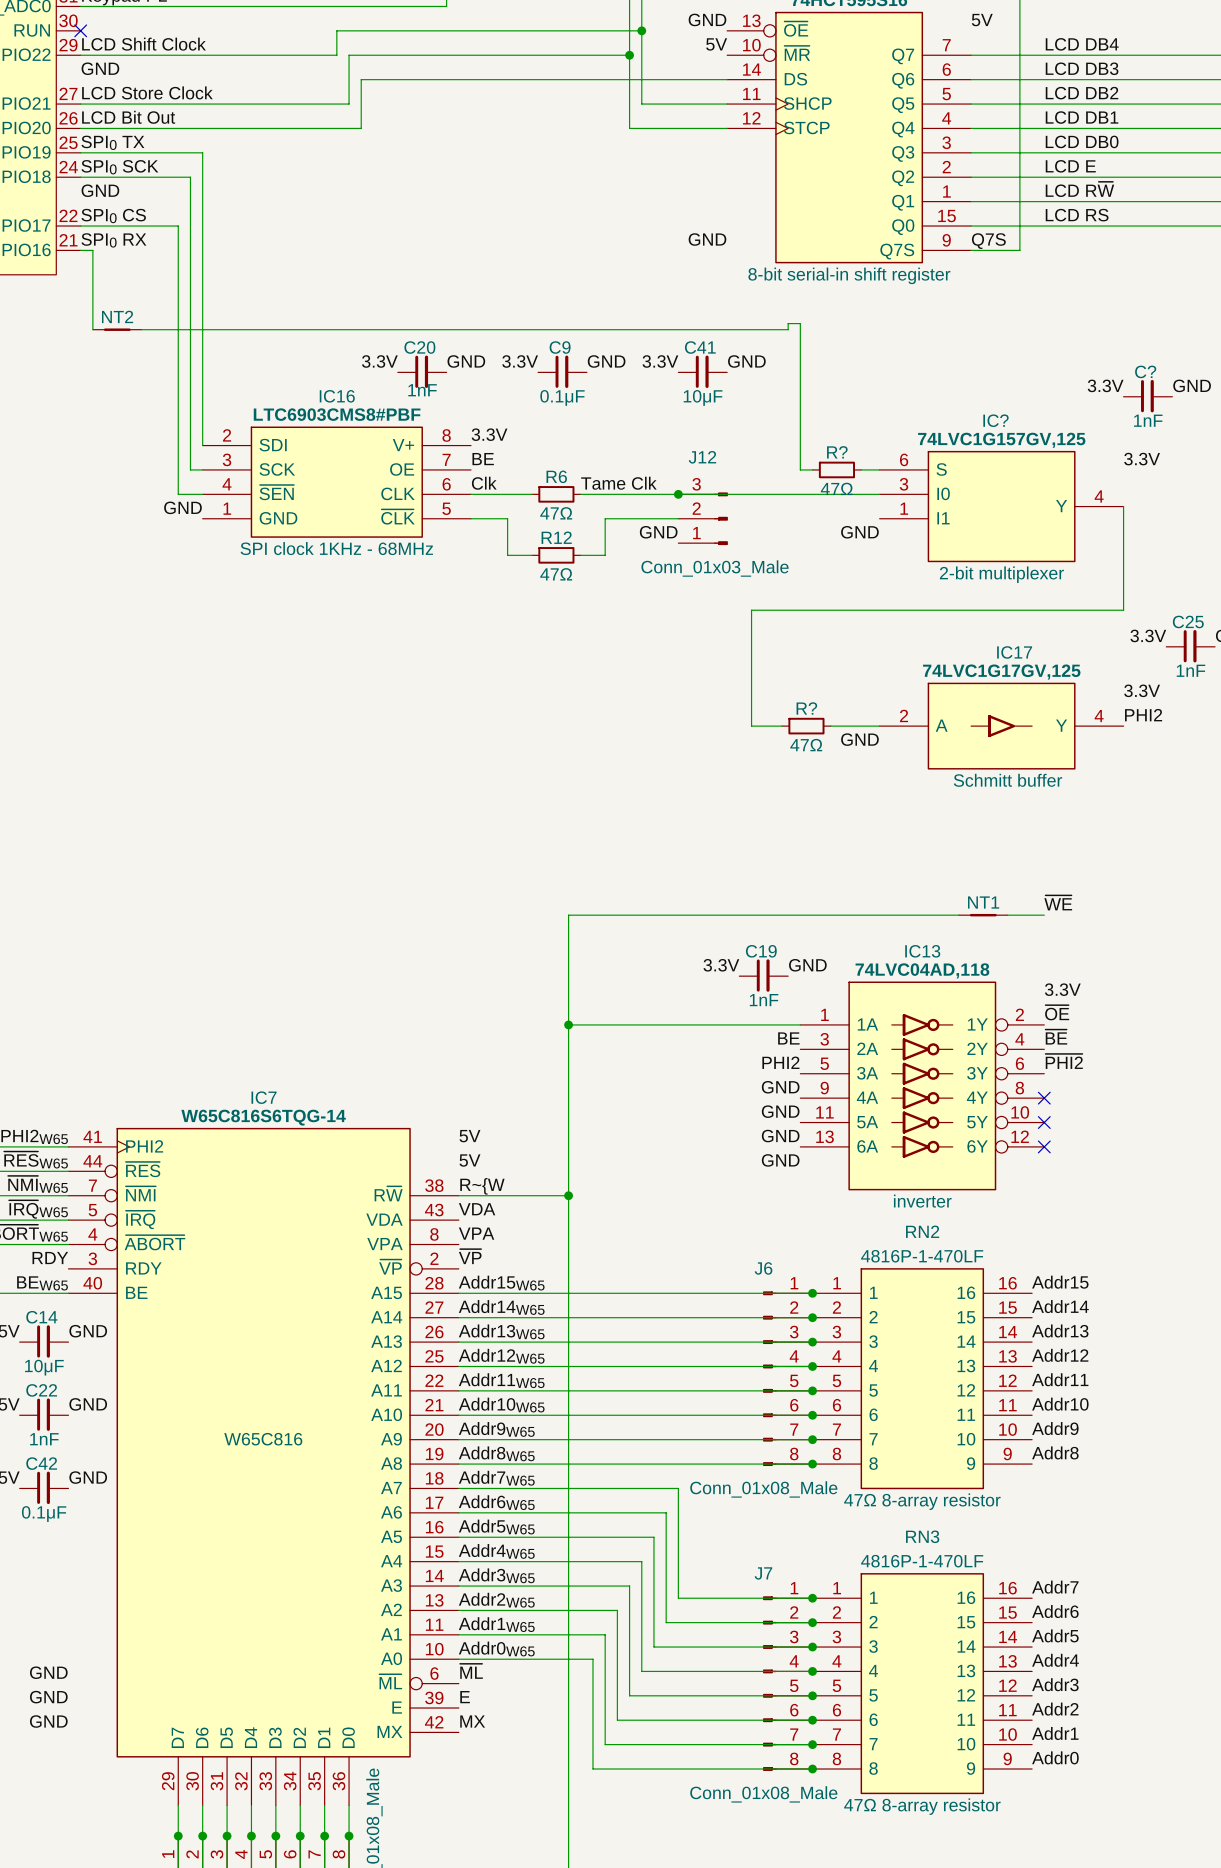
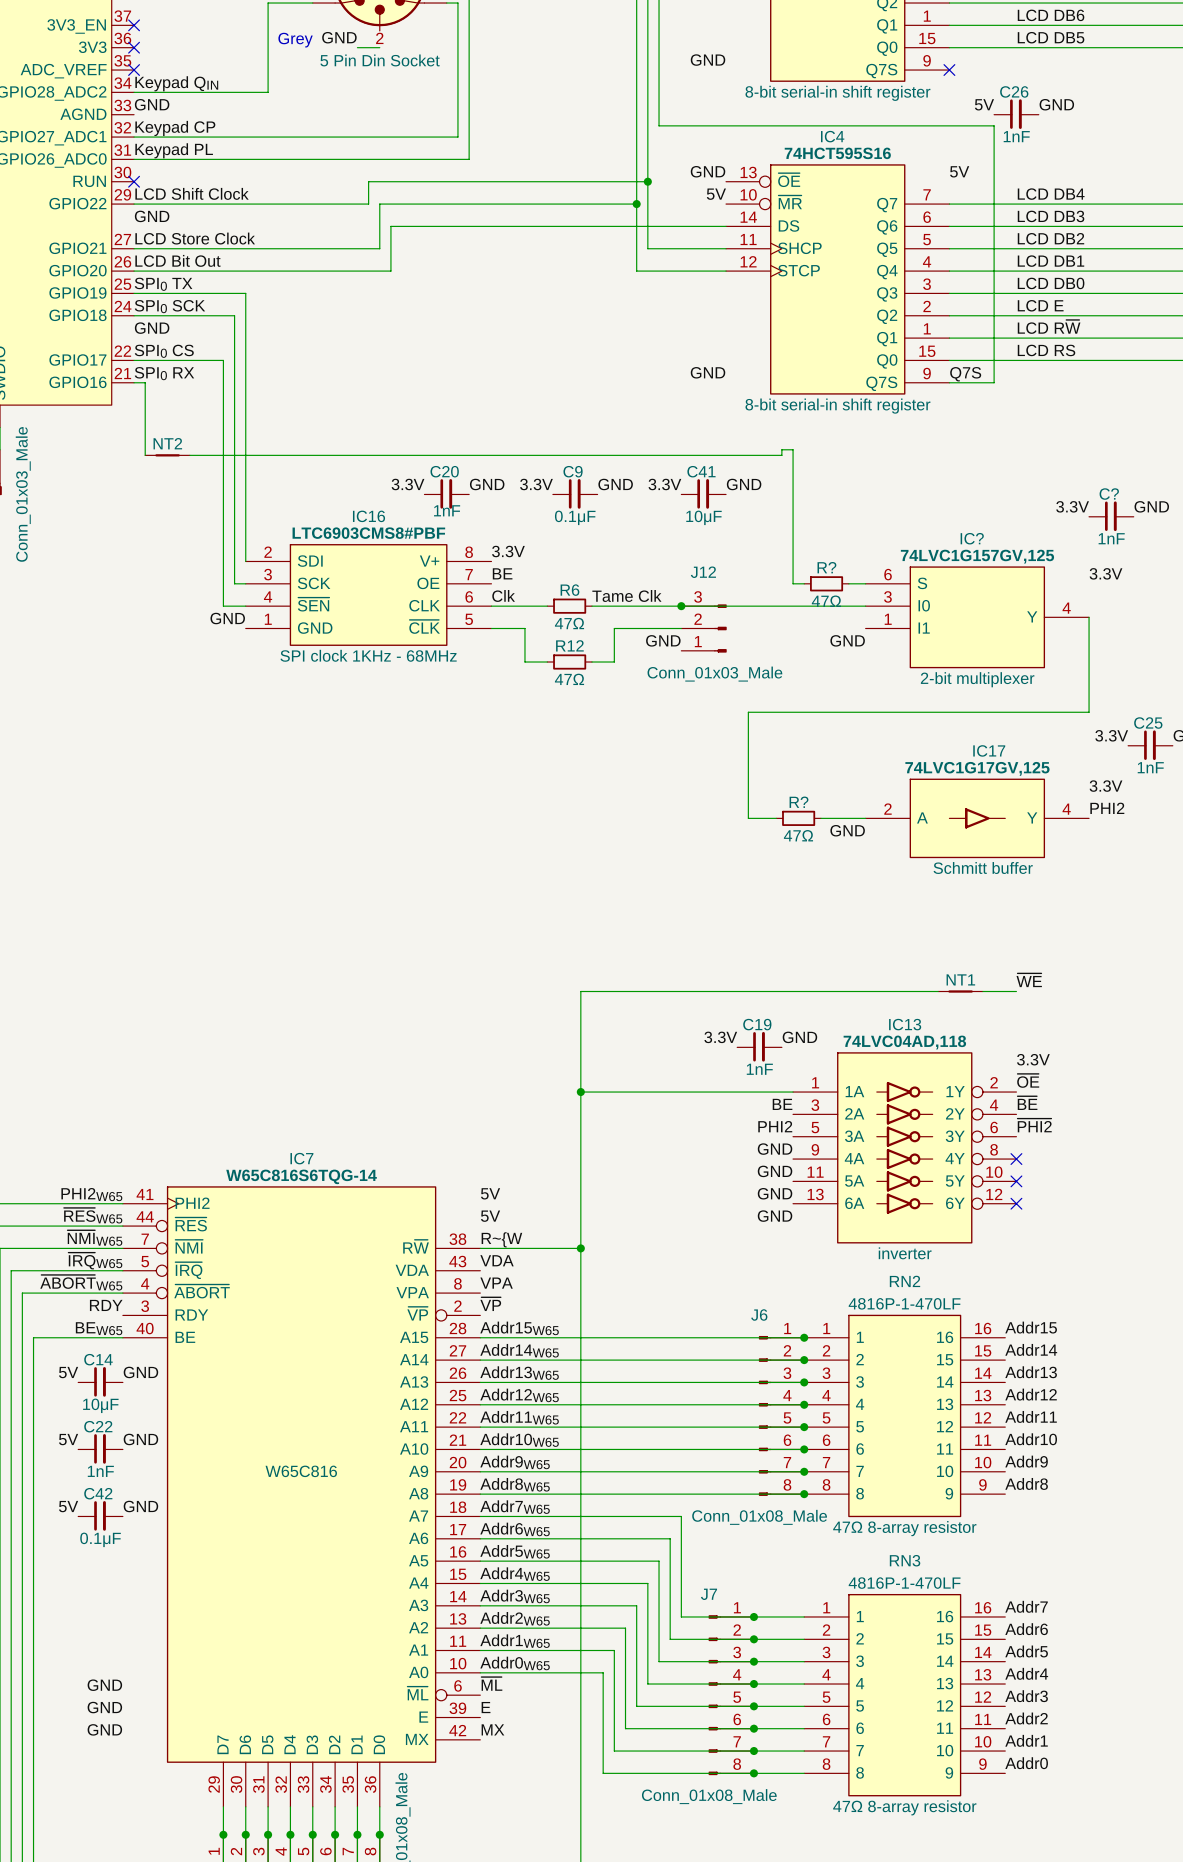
junction: none -> (753, 1616)
junction: (812, 1598) -> none
junction: none -> (753, 1639)
junction: (812, 1622) -> none
junction: none -> (753, 1661)
junction: (812, 1647) -> none
junction: none -> (753, 1684)
junction: (812, 1671) -> none
J7 position: (787, 1683) -> (731, 1695)
junction: none -> (753, 1706)
junction: (812, 1695) -> none
junction: none -> (753, 1728)
junction: (812, 1720) -> none
junction: none -> (753, 1751)
junction: (812, 1744) -> none
junction: none -> (753, 1773)
junction: (812, 1769) -> none

